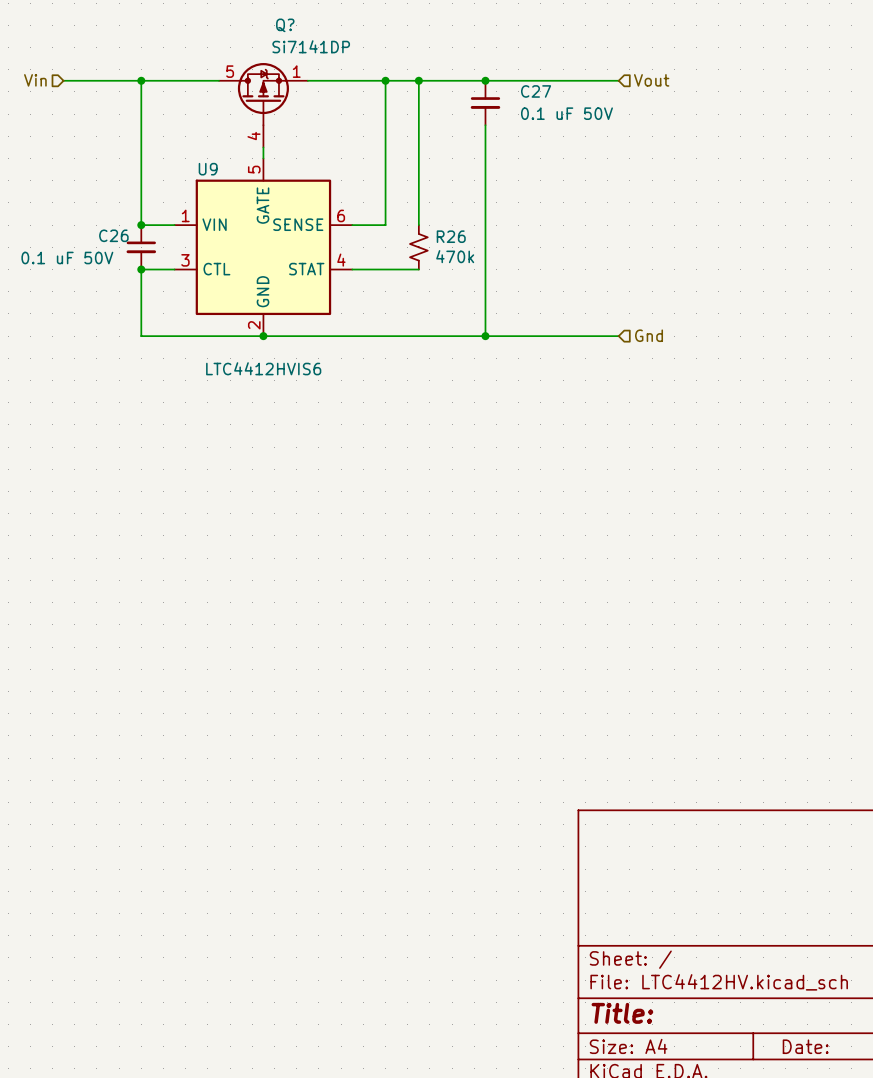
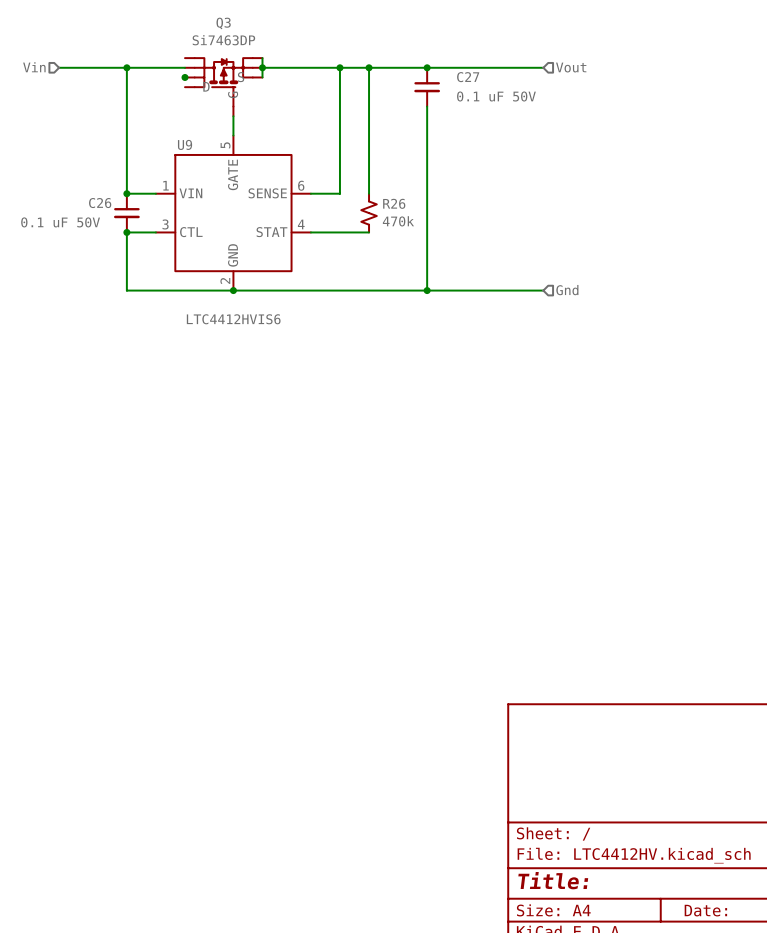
wire: none -> (262, 58) (262, 77)
junction: none -> (262, 67)
junction: none -> (185, 77)
Q3: none -> Si7463DP (223, 87)
Q?: Si7141DP (263, 105) -> none

